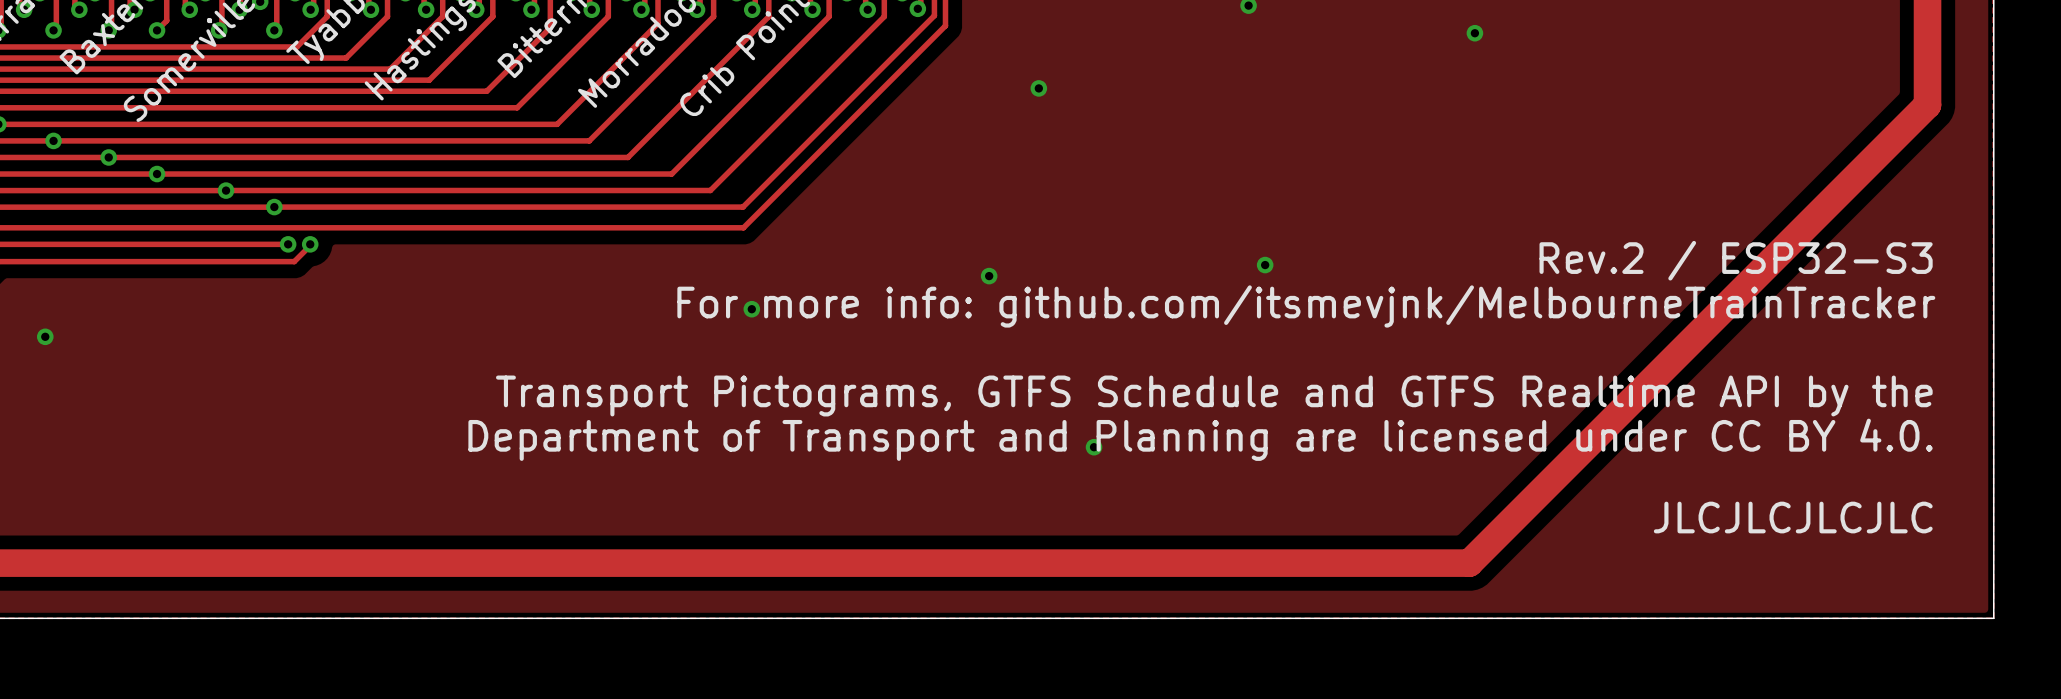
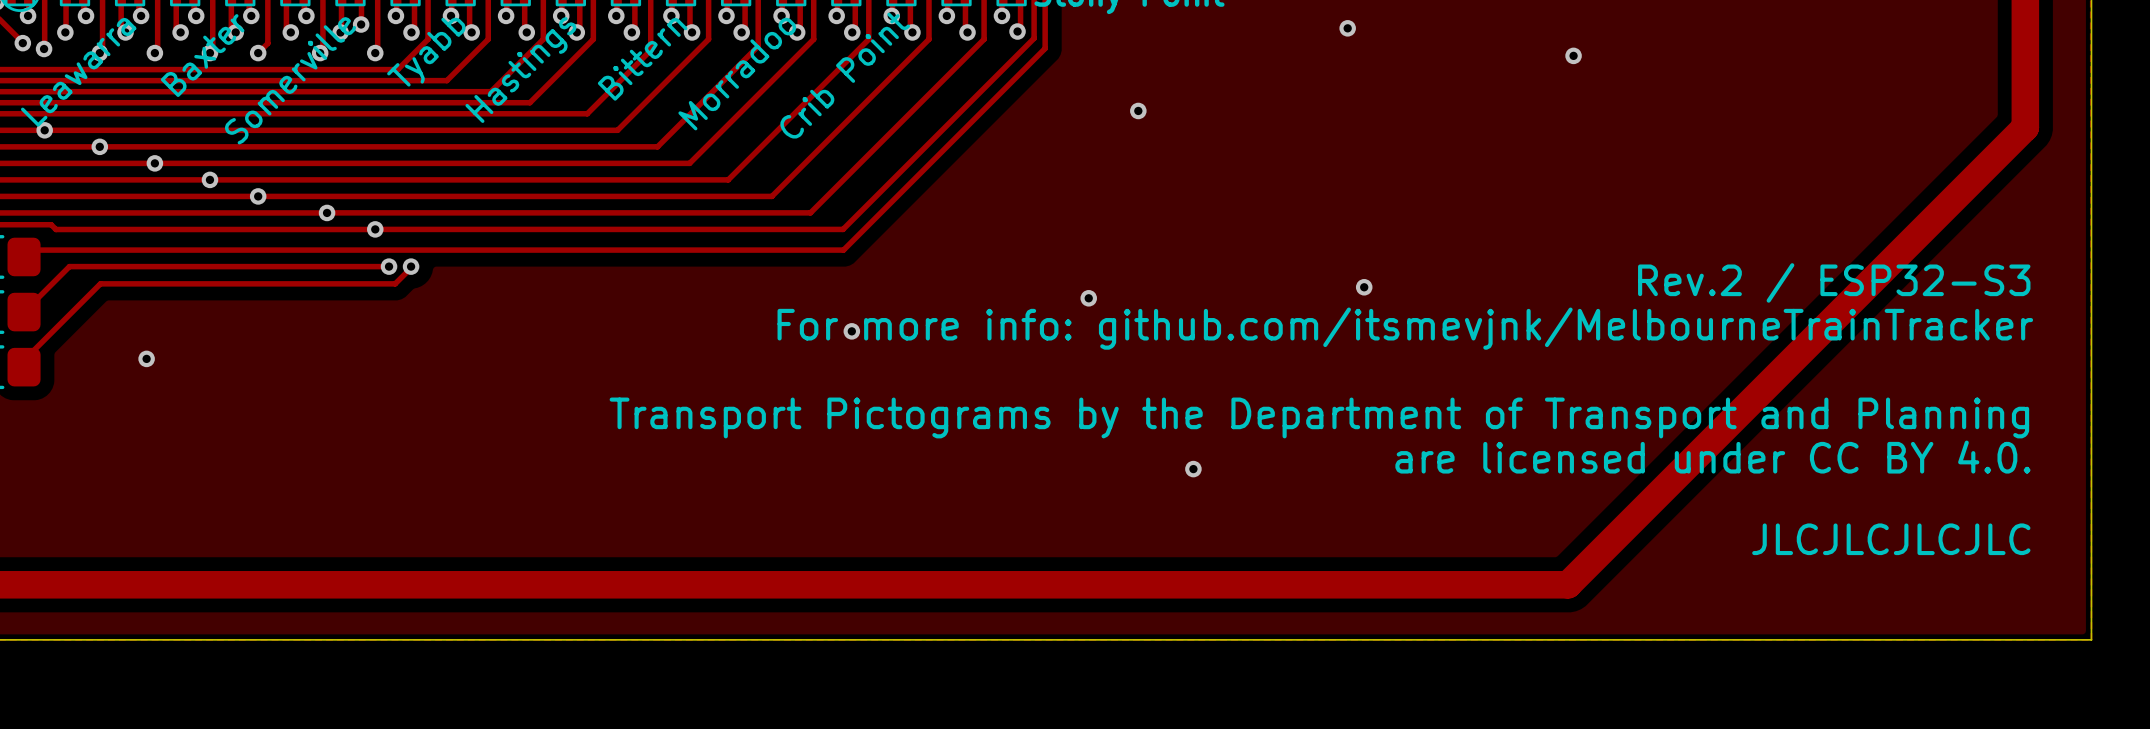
text: Transport Pictograms, GTFS Schedule and GTFS Realtime API by the (1214, 395) -> Transport Pictograms by the Department of Transport and Planning (1319, 417)
text: Department of Transport and Planning are licensed under CC BY 4.0. (1200, 439) -> are licensed under CC BY 4.0. (1712, 457)

